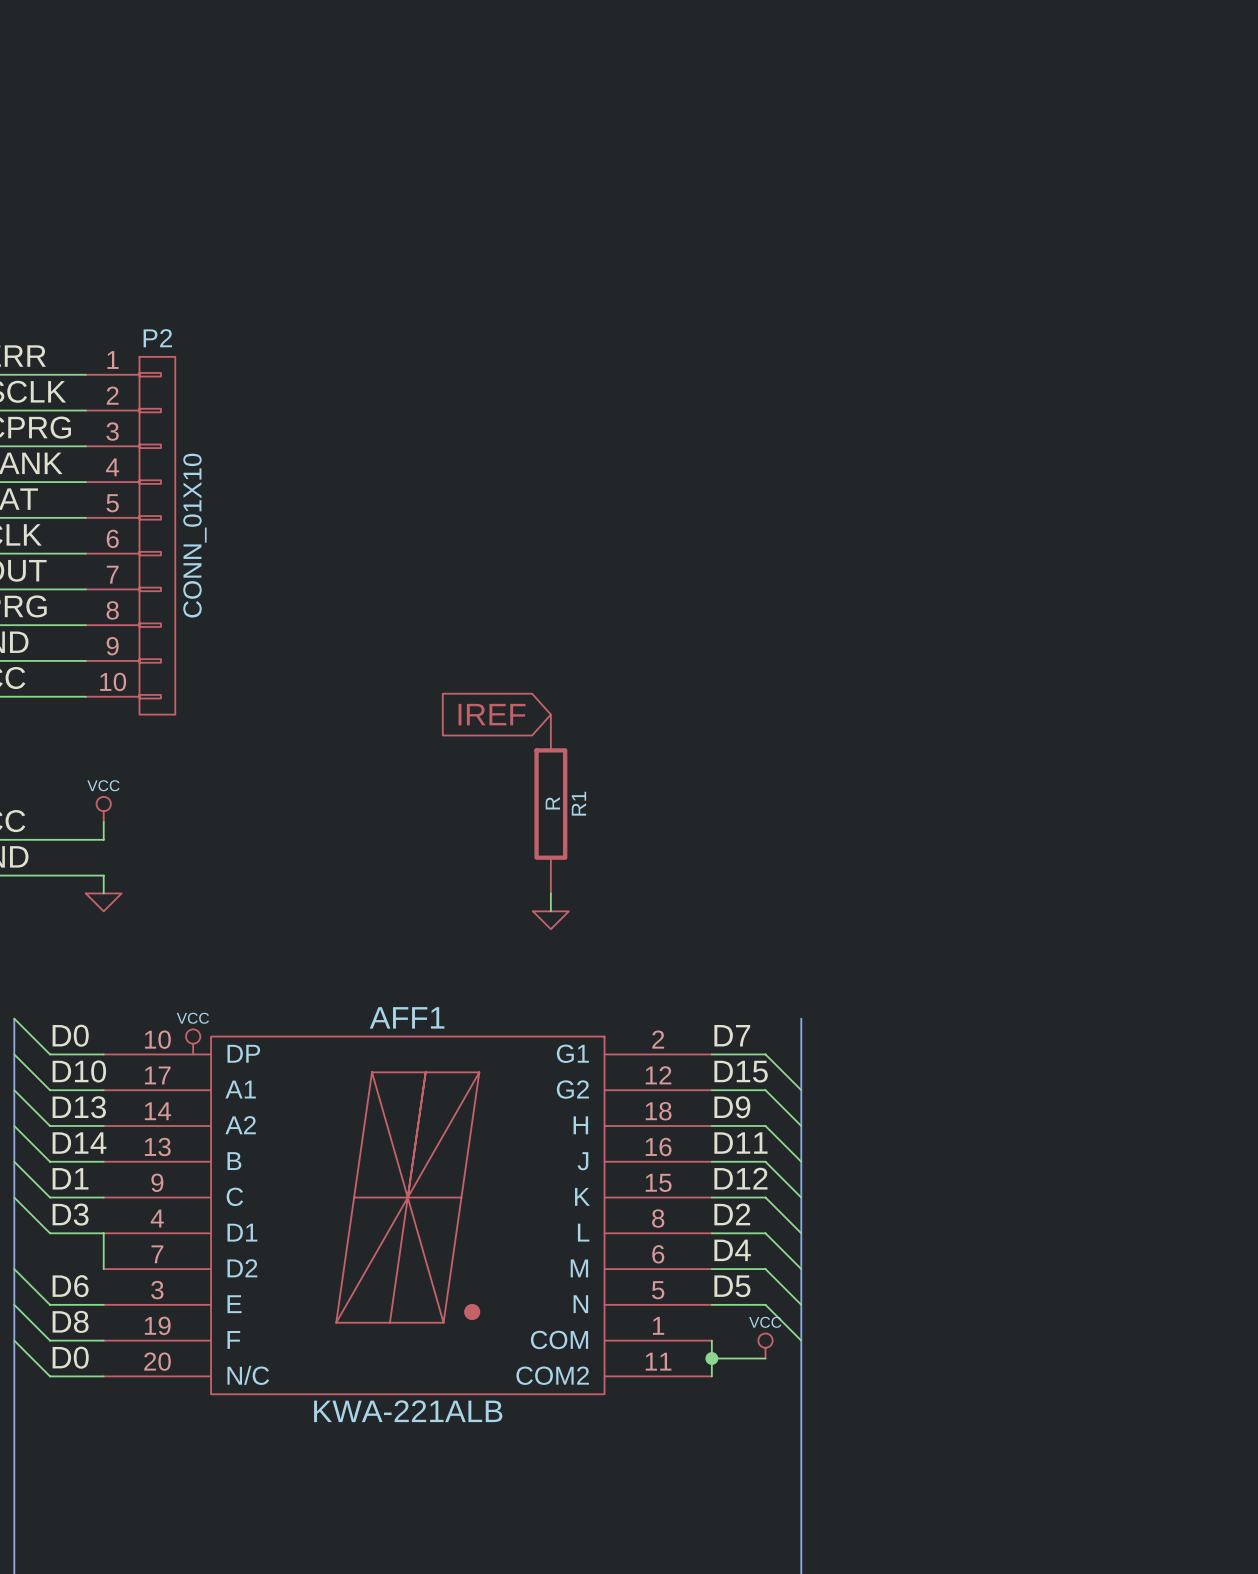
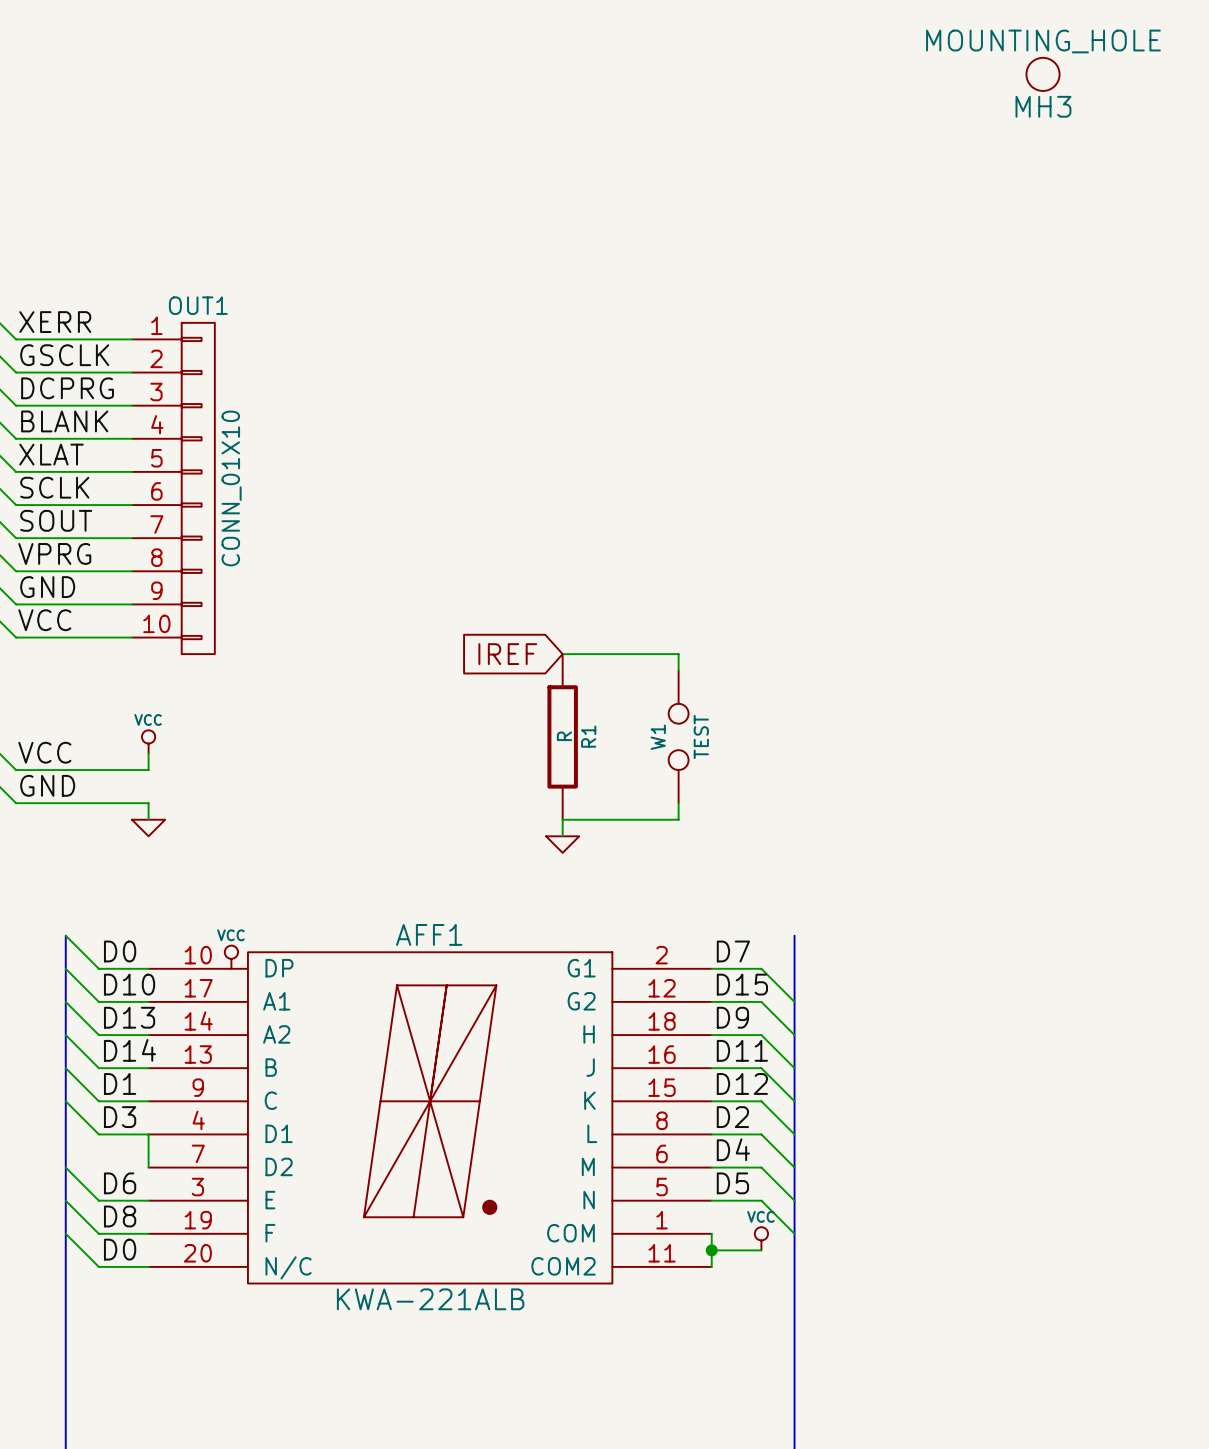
MH3: none -> MOUNTING_HOLE (1042, 74)
P2 name: P2 (157, 338) -> OUT1 (198, 305)
wire: none -> (562, 654) (678, 654) (678, 670)
W1: none -> TEST (678, 736)
wire: none -> (678, 803) (678, 819) (562, 819)

